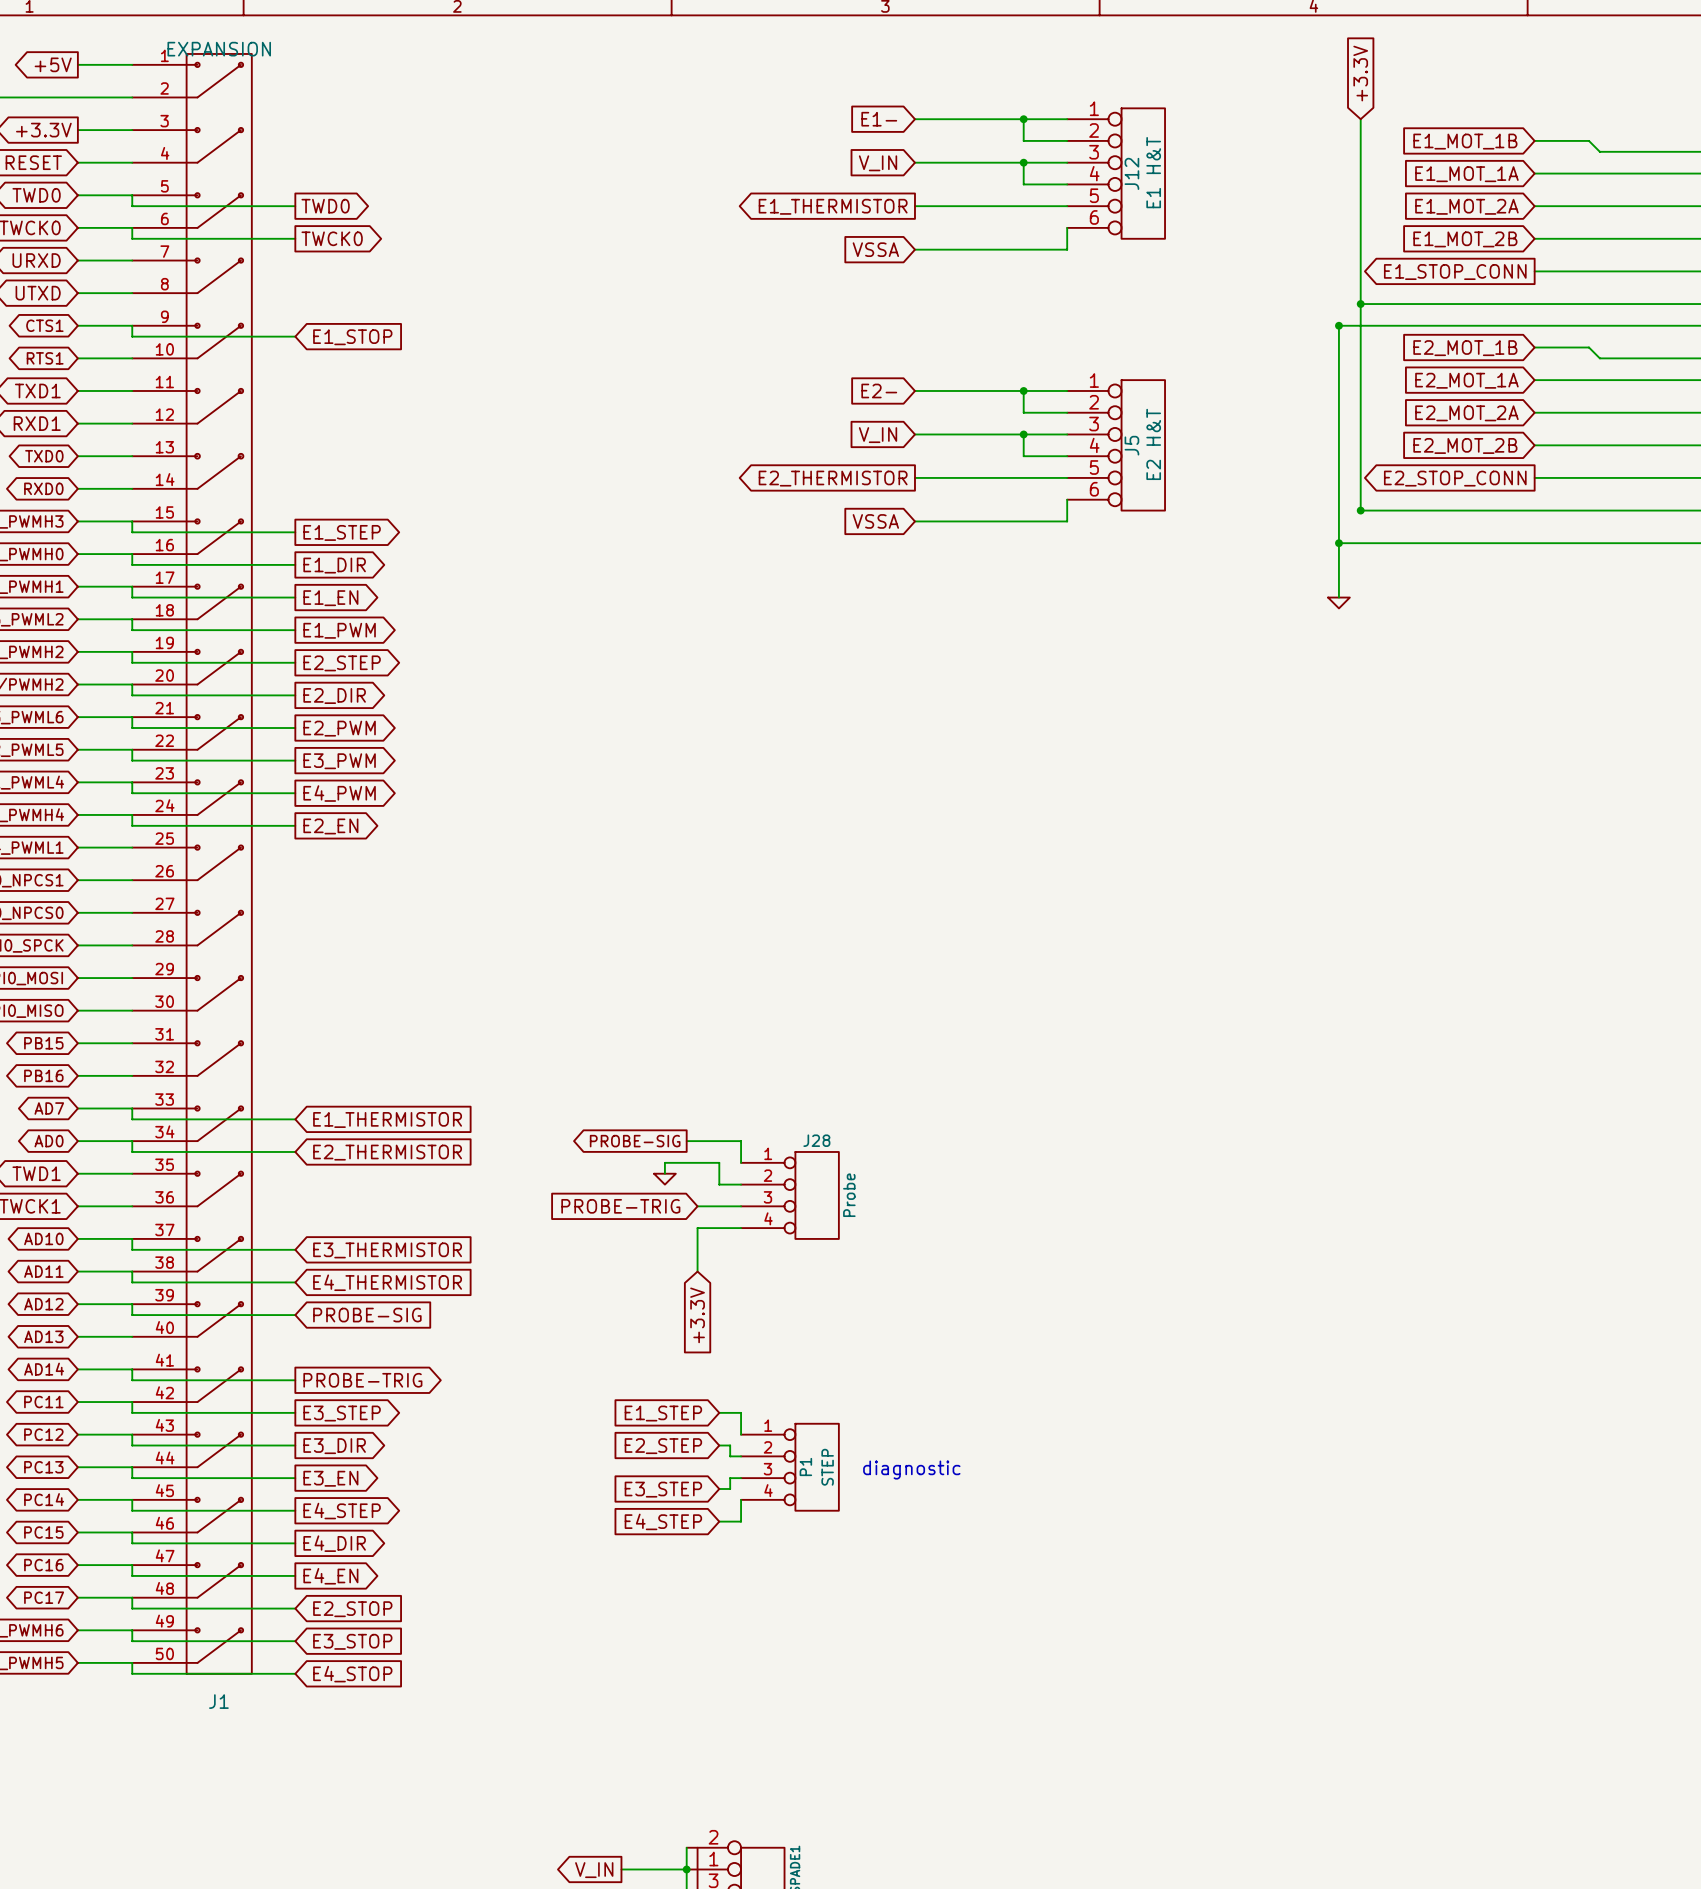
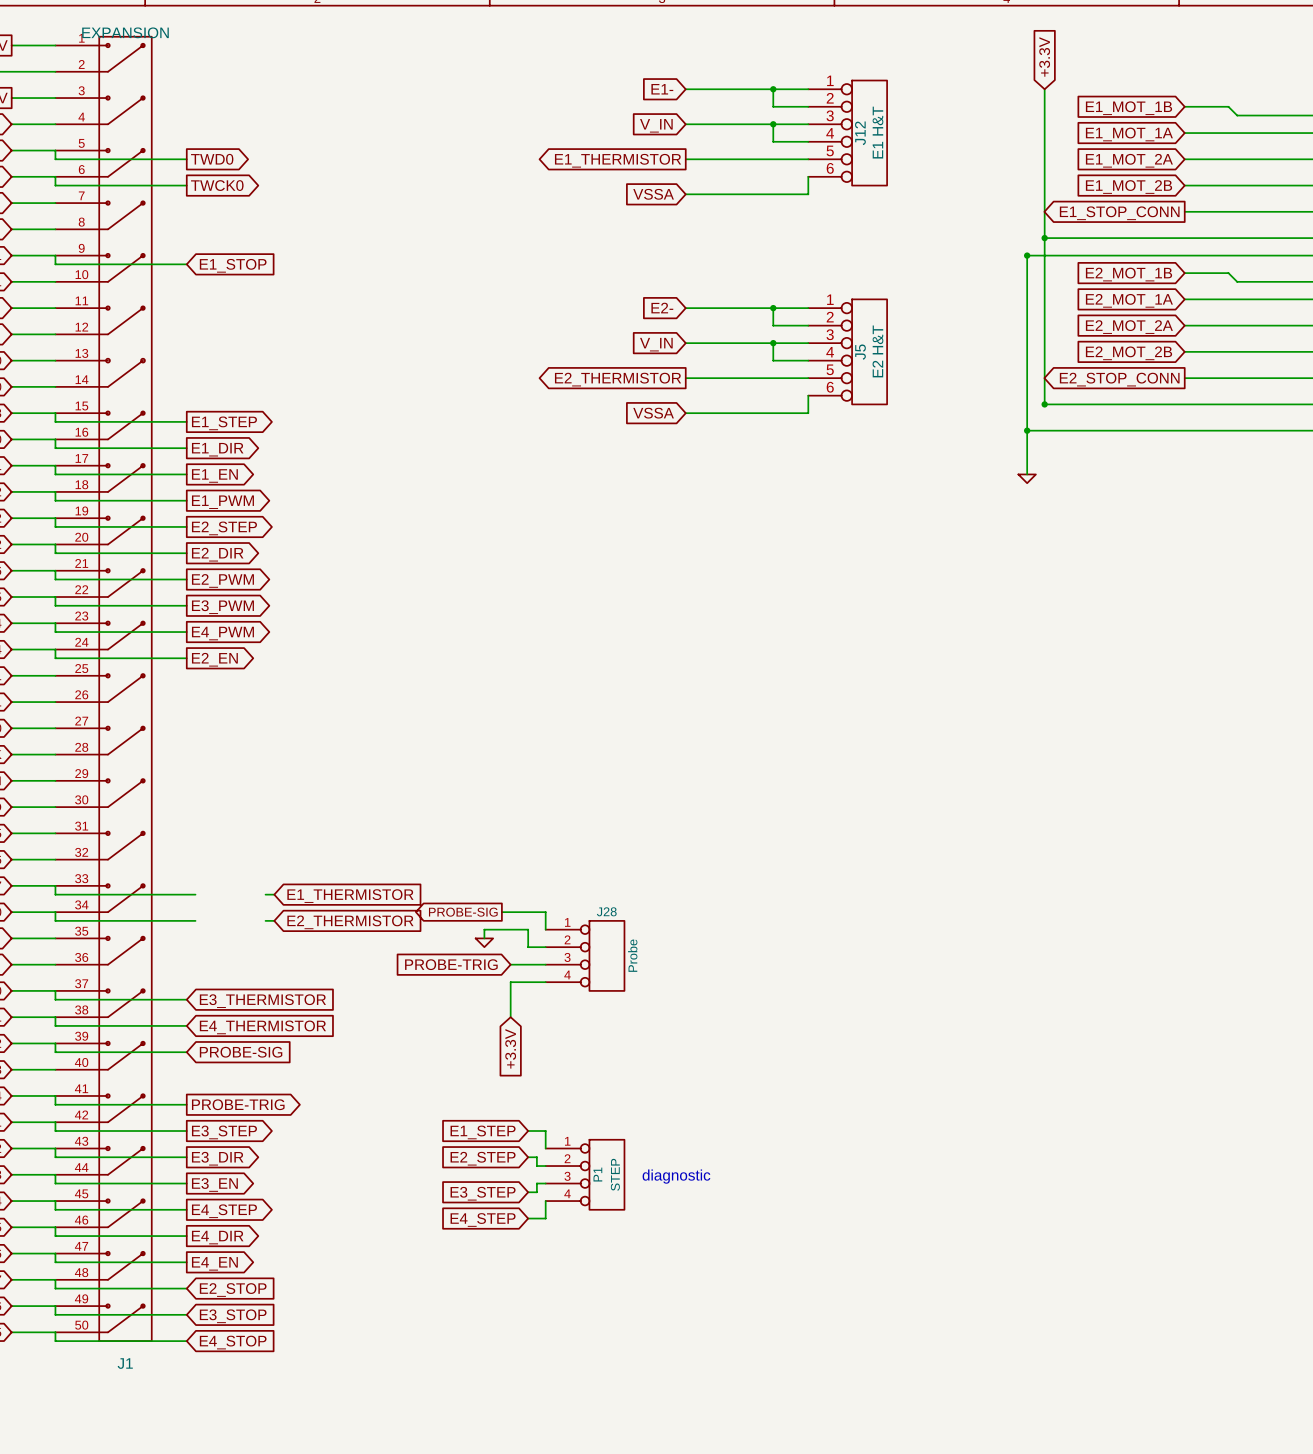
wire: none -> (186, 894) (195, 894)
global label position: E1_THERMISTOR (387, 1119) -> E1_THERMISTOR (350, 896)
wire: none -> (265, 894) (274, 894)
wire: none -> (186, 920) (195, 920)
wire: none -> (265, 920) (274, 920)
global label position: E2_THERMISTOR (387, 1152) -> E2_THERMISTOR (350, 922)

